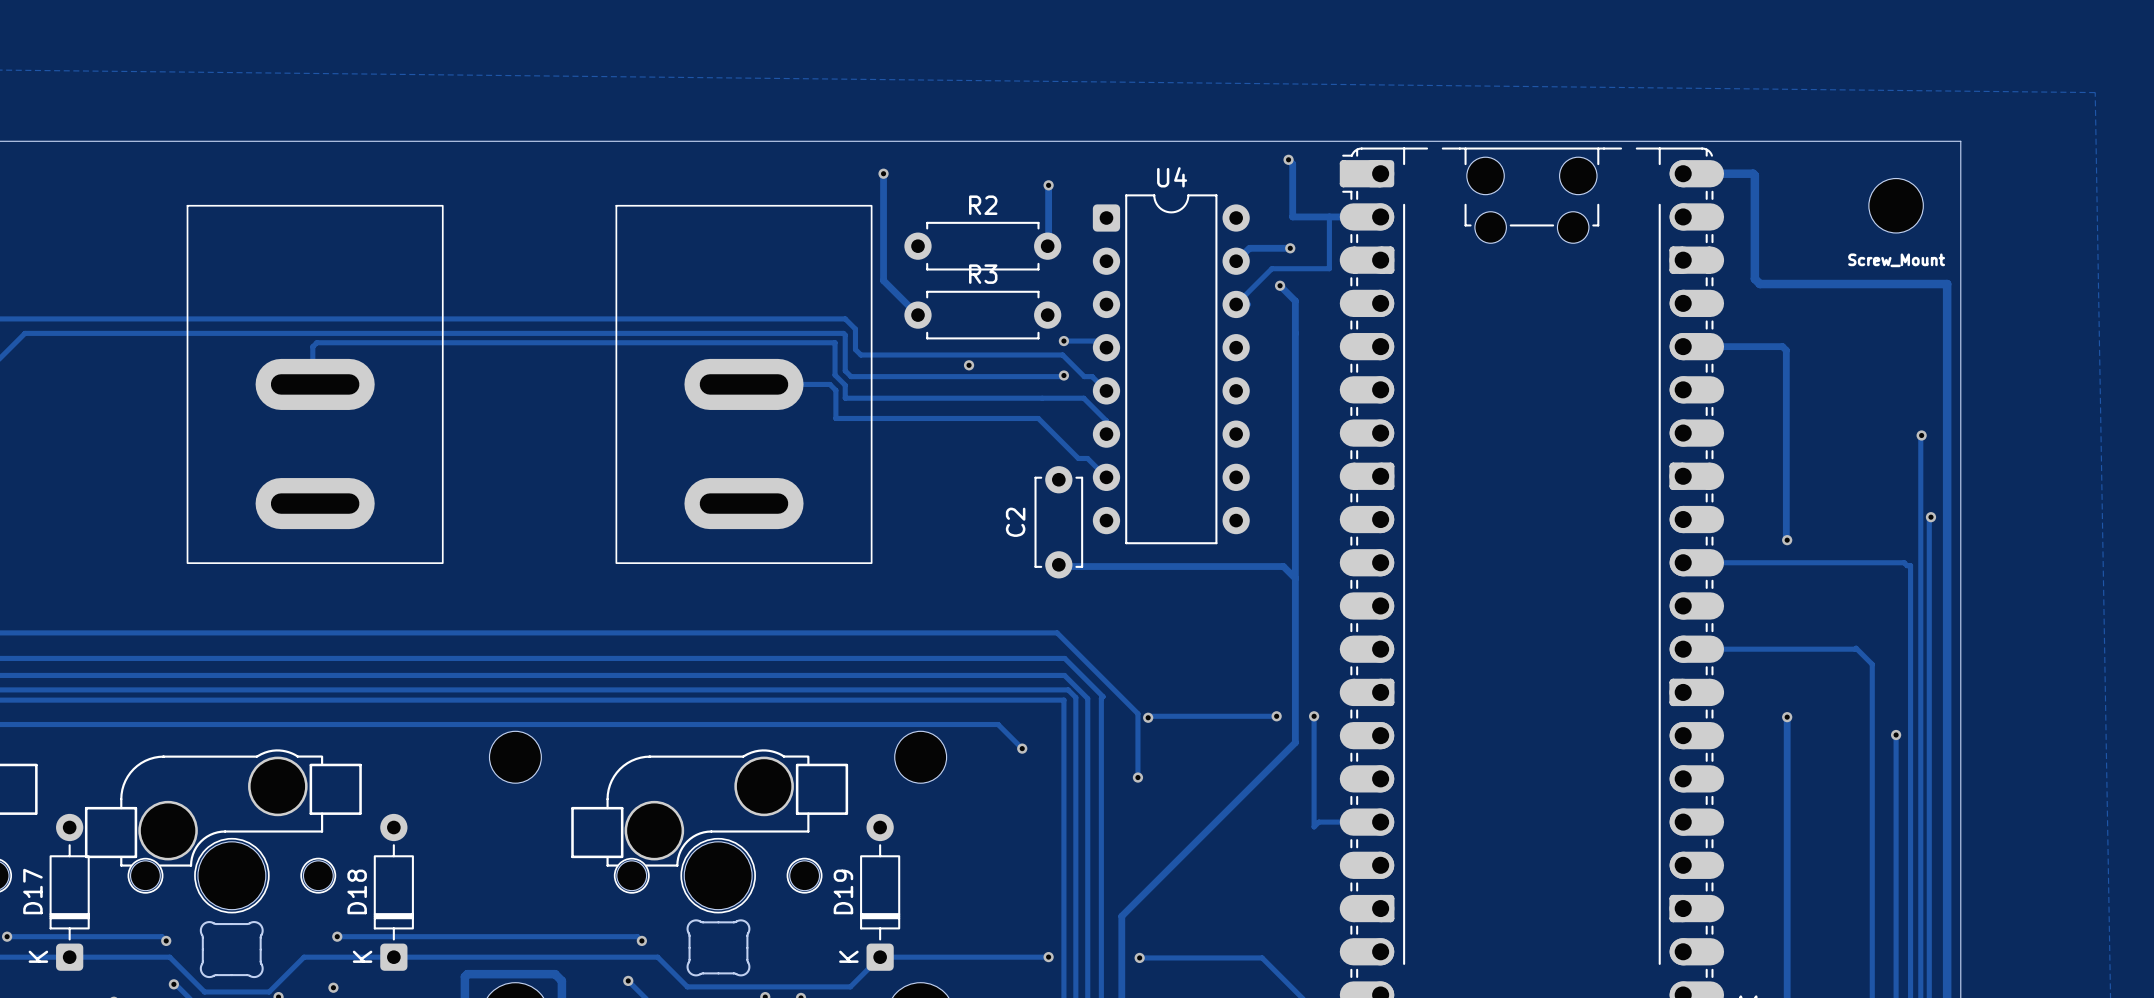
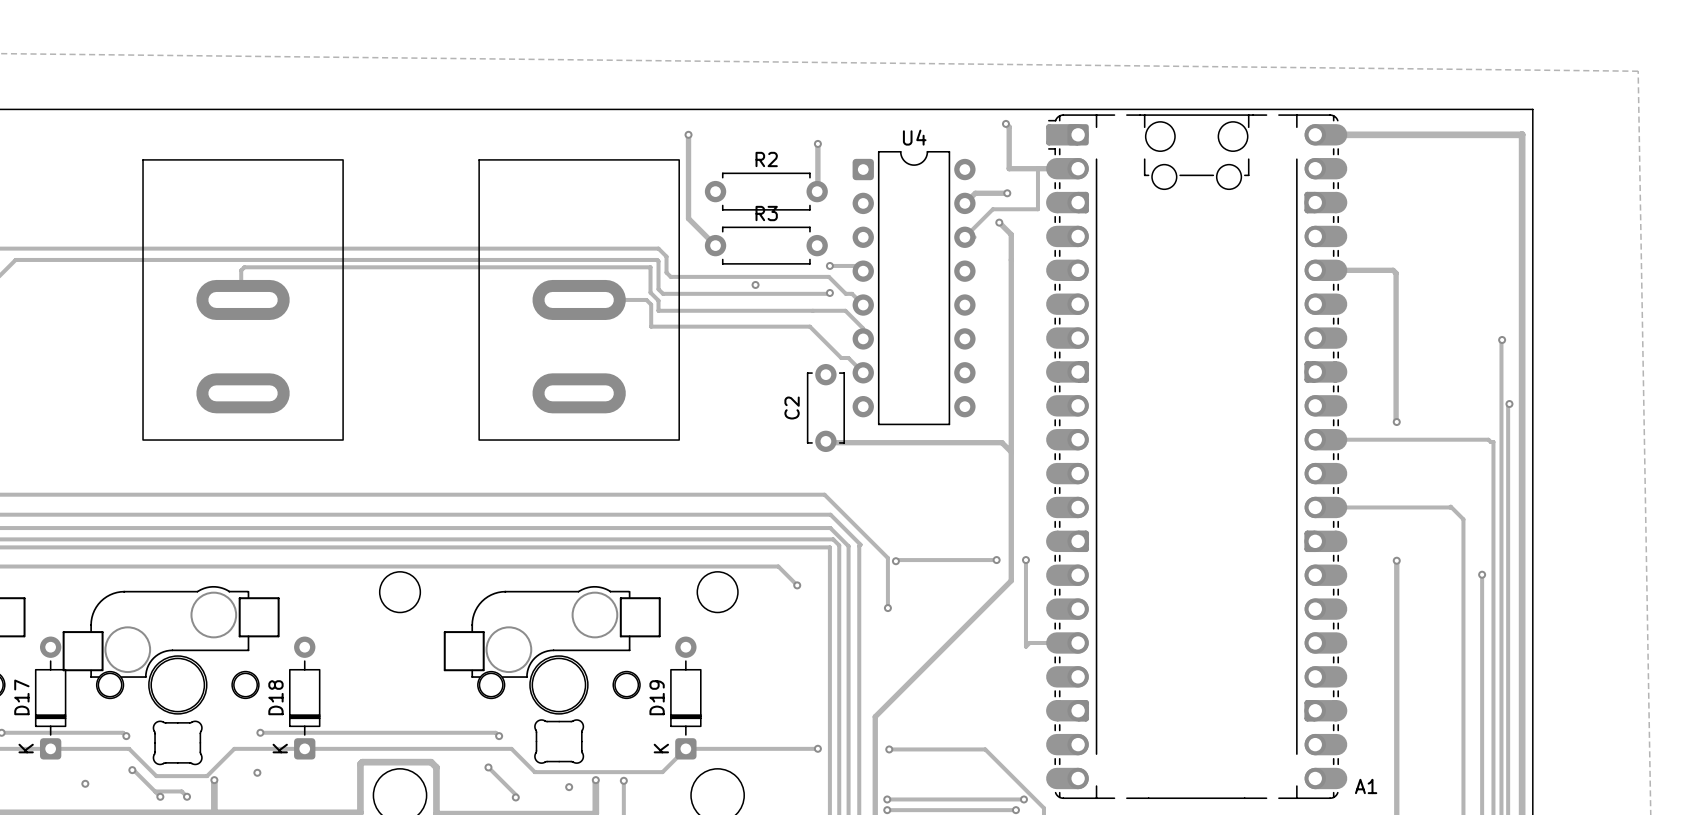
track: (1753, 173) (1754, 175) (1754, 278) (1759, 284) (1947, 284) -> (1370, 134) (1522, 134) (1522, 221)
Screw_Mount: (1896, 205) -> none

